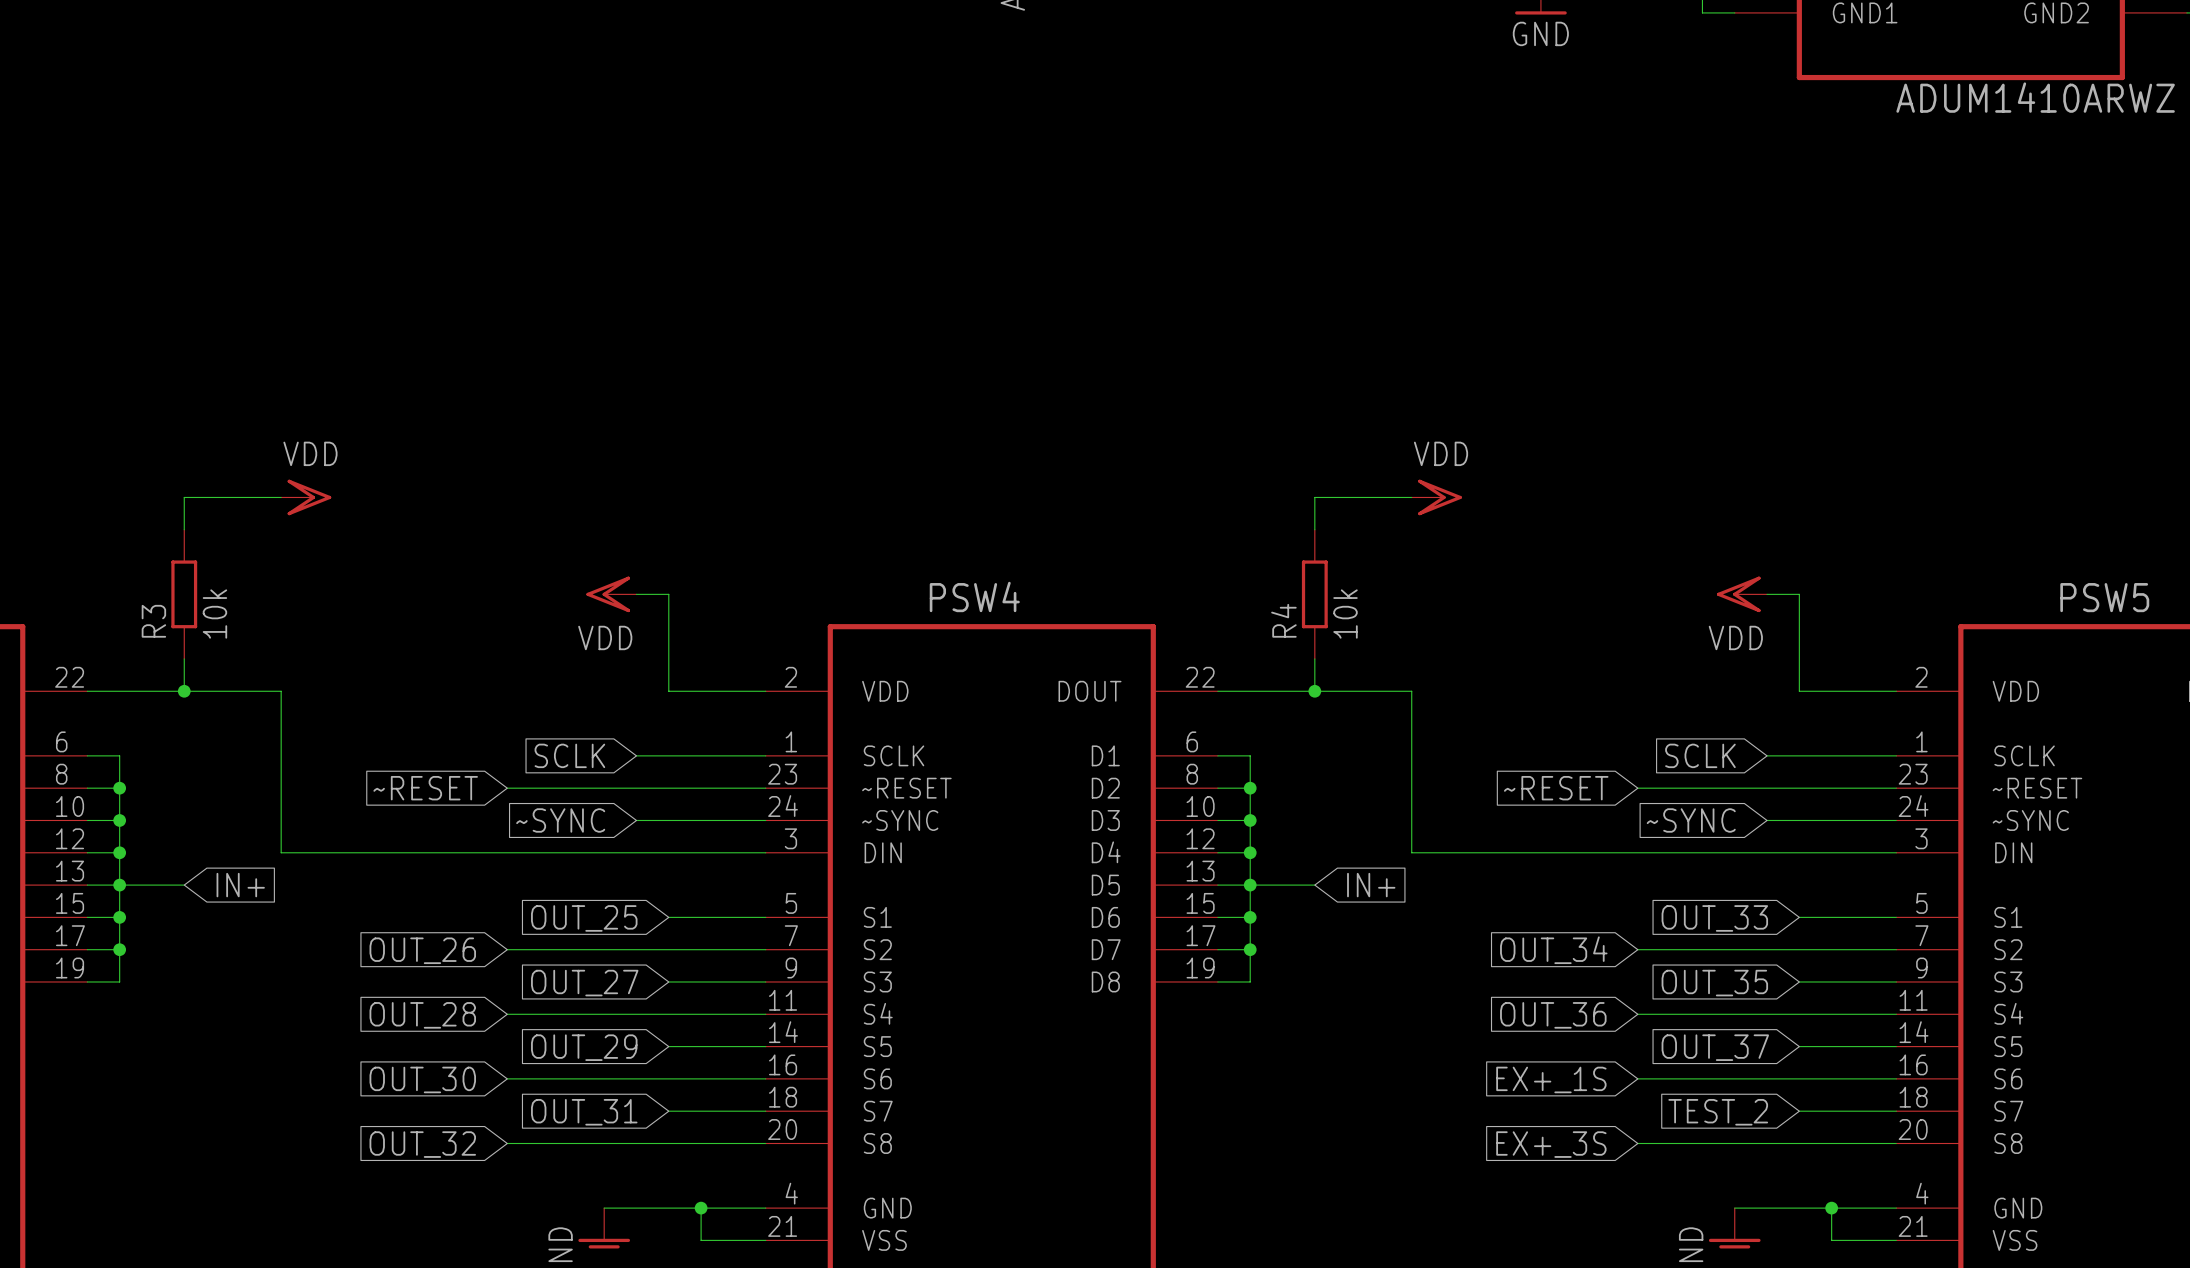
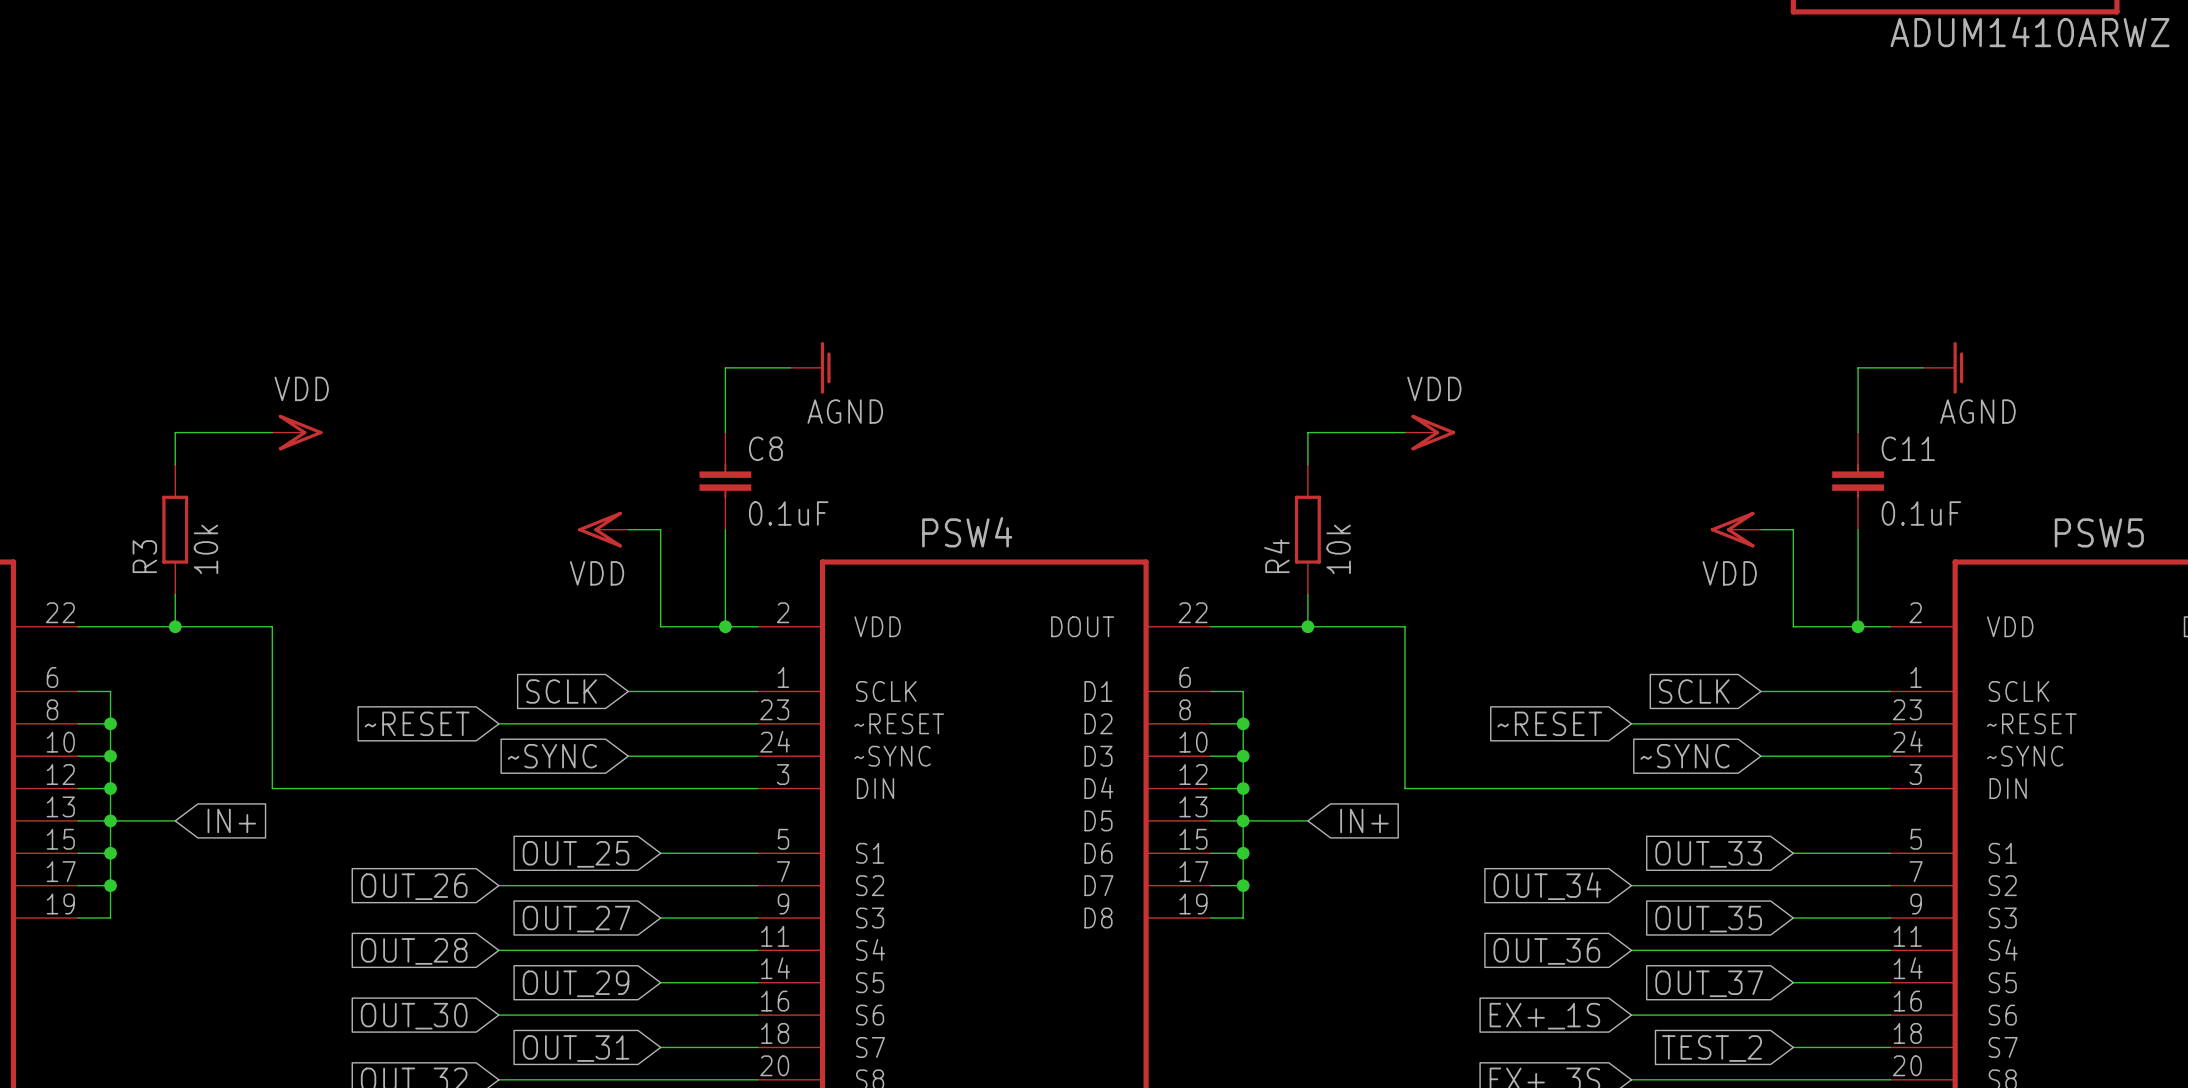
wire: none -> (790, 367) (725, 367) (725, 432)
power symbol: none -> AGND (810, 367)
wire: none -> (1922, 367) (1858, 367) (1858, 432)
power symbol: none -> AGND (1943, 367)
C8: none -> 0.1uF (725, 481)
C11: none -> 0.1uF (1858, 481)
wire: none -> (725, 529) (725, 626)
wire: none -> (1858, 529) (1858, 626)
junction: none -> (725, 626)
junction: none -> (1858, 626)

